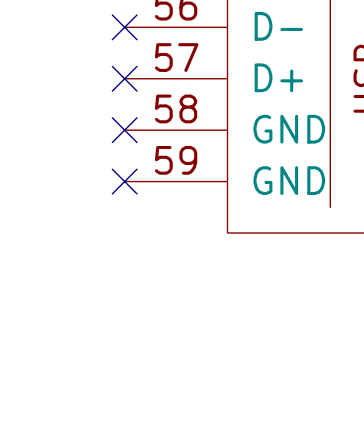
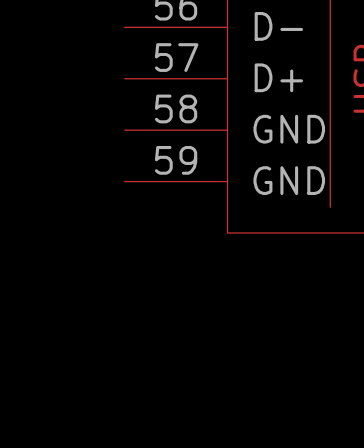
no-connect mark: (124, 27) -> none
no-connect mark: (124, 78) -> none
no-connect mark: (124, 130) -> none
no-connect mark: (124, 181) -> none

